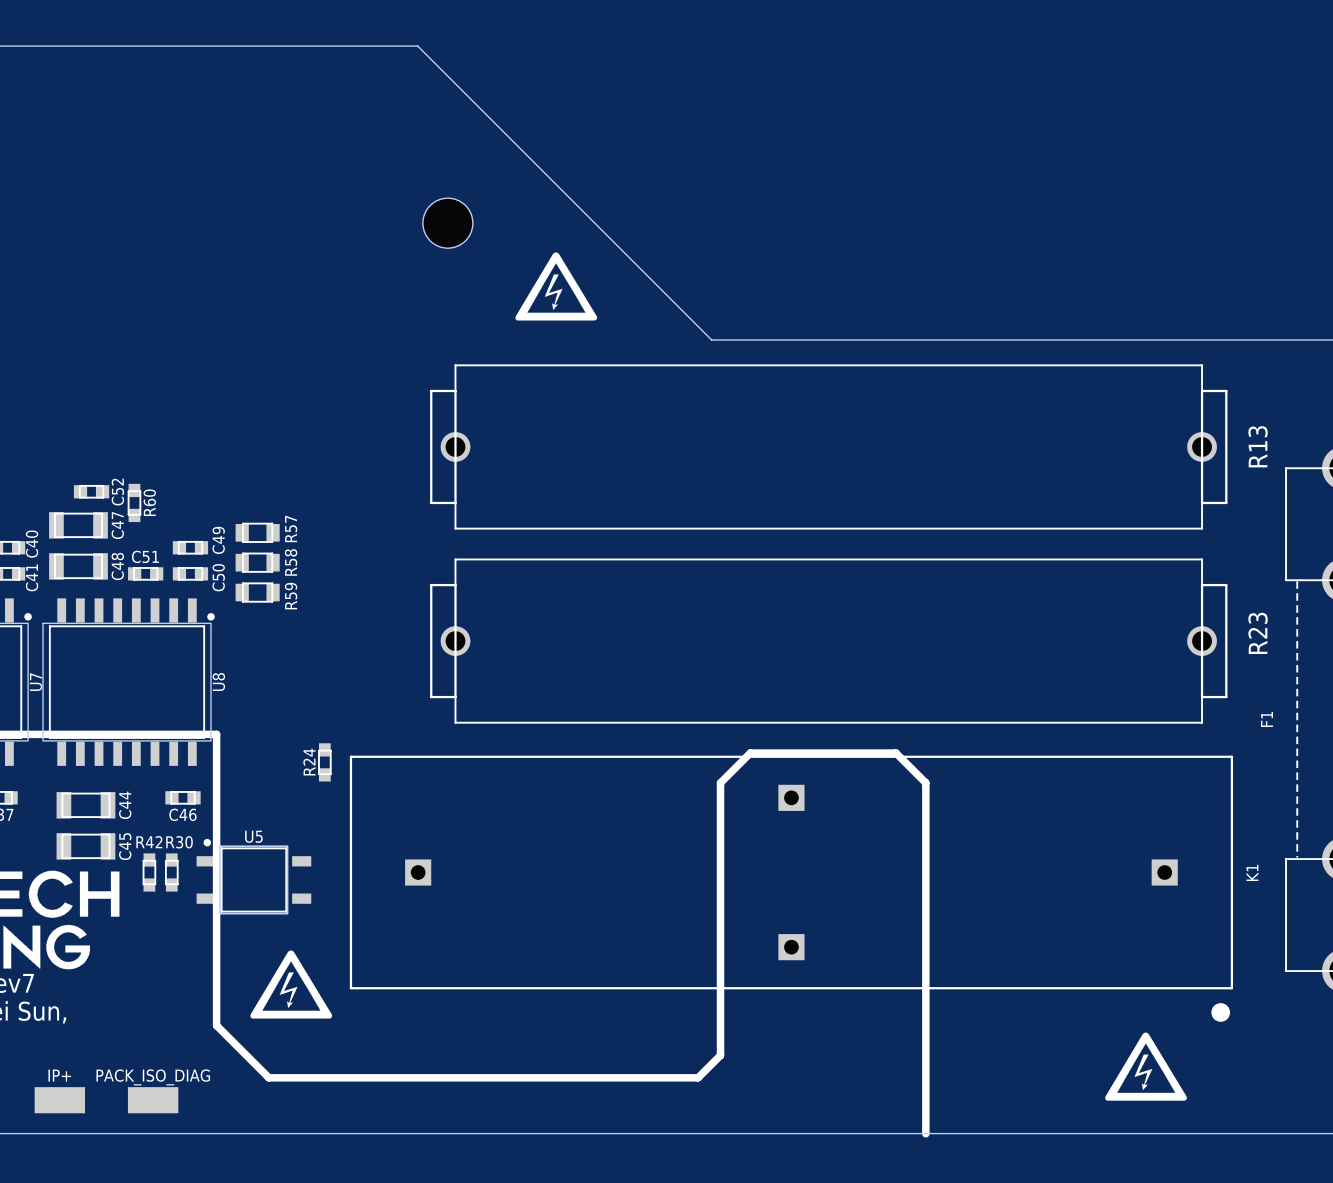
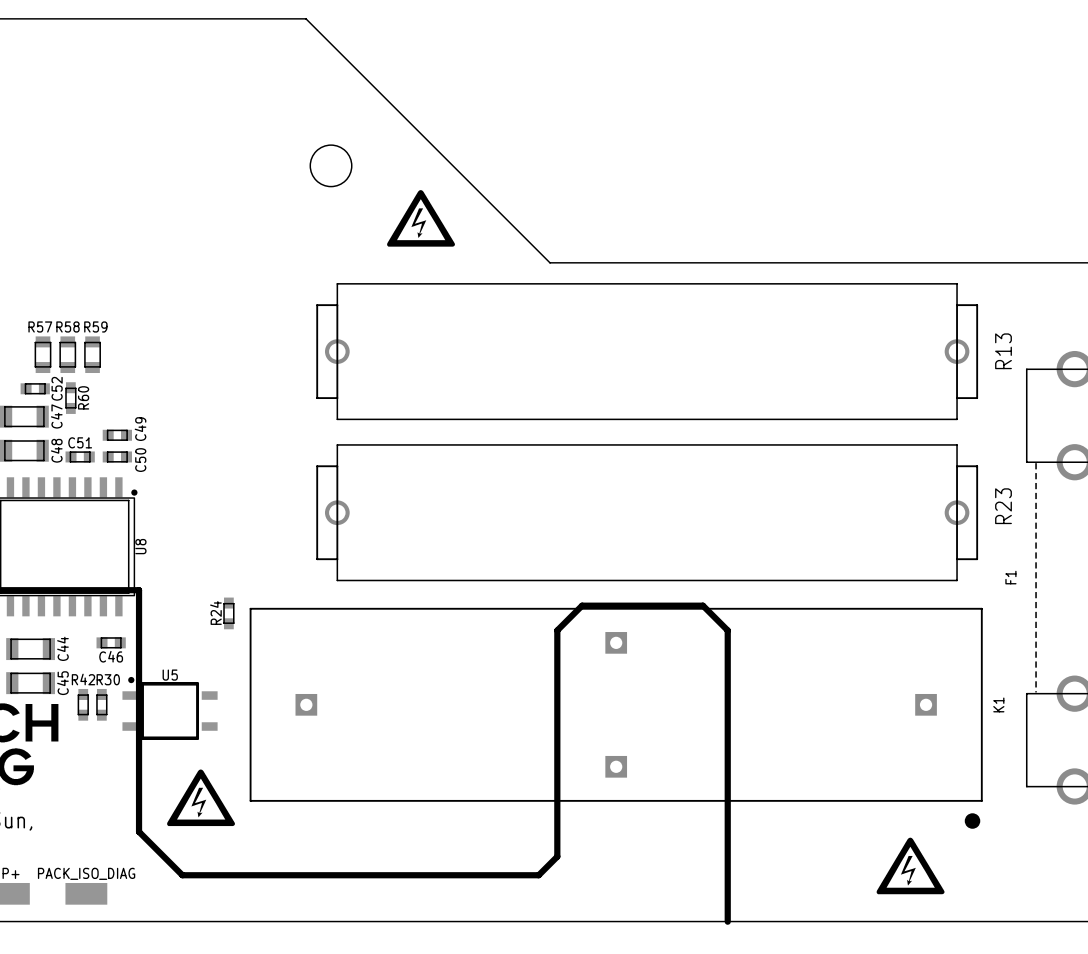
R57 name position: R57 (291, 529) -> R57 (40, 326)
R57 rotation: 0° (257, 532) -> 90° clockwise (42, 354)
R57 position: (257, 532) -> (42, 354)
R58 rotation: 0° (257, 562) -> 90° clockwise (67, 354)
R58 position: (257, 562) -> (67, 354)
R58 name position: R58 (291, 562) -> R58 (67, 326)
R59 rotation: 0° (257, 592) -> 90° clockwise (92, 354)
R59 position: (257, 592) -> (92, 354)
R59 name position: R59 (291, 596) -> R59 (95, 326)

